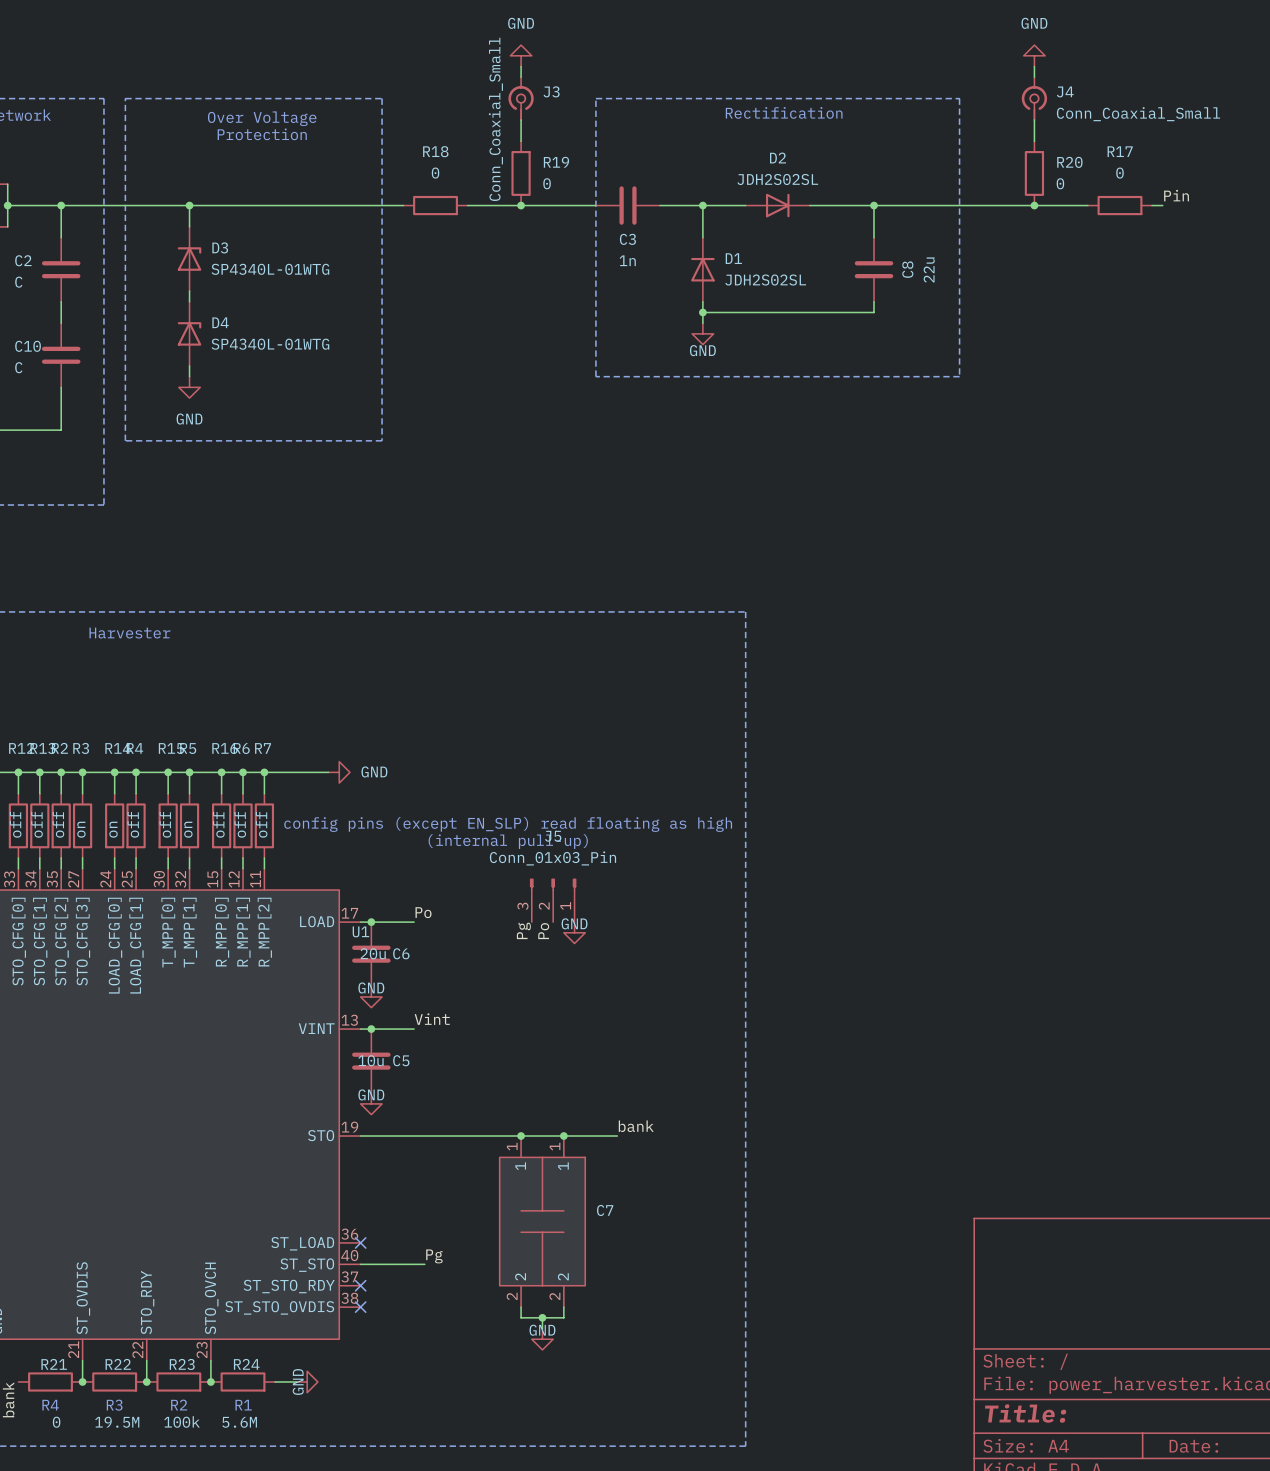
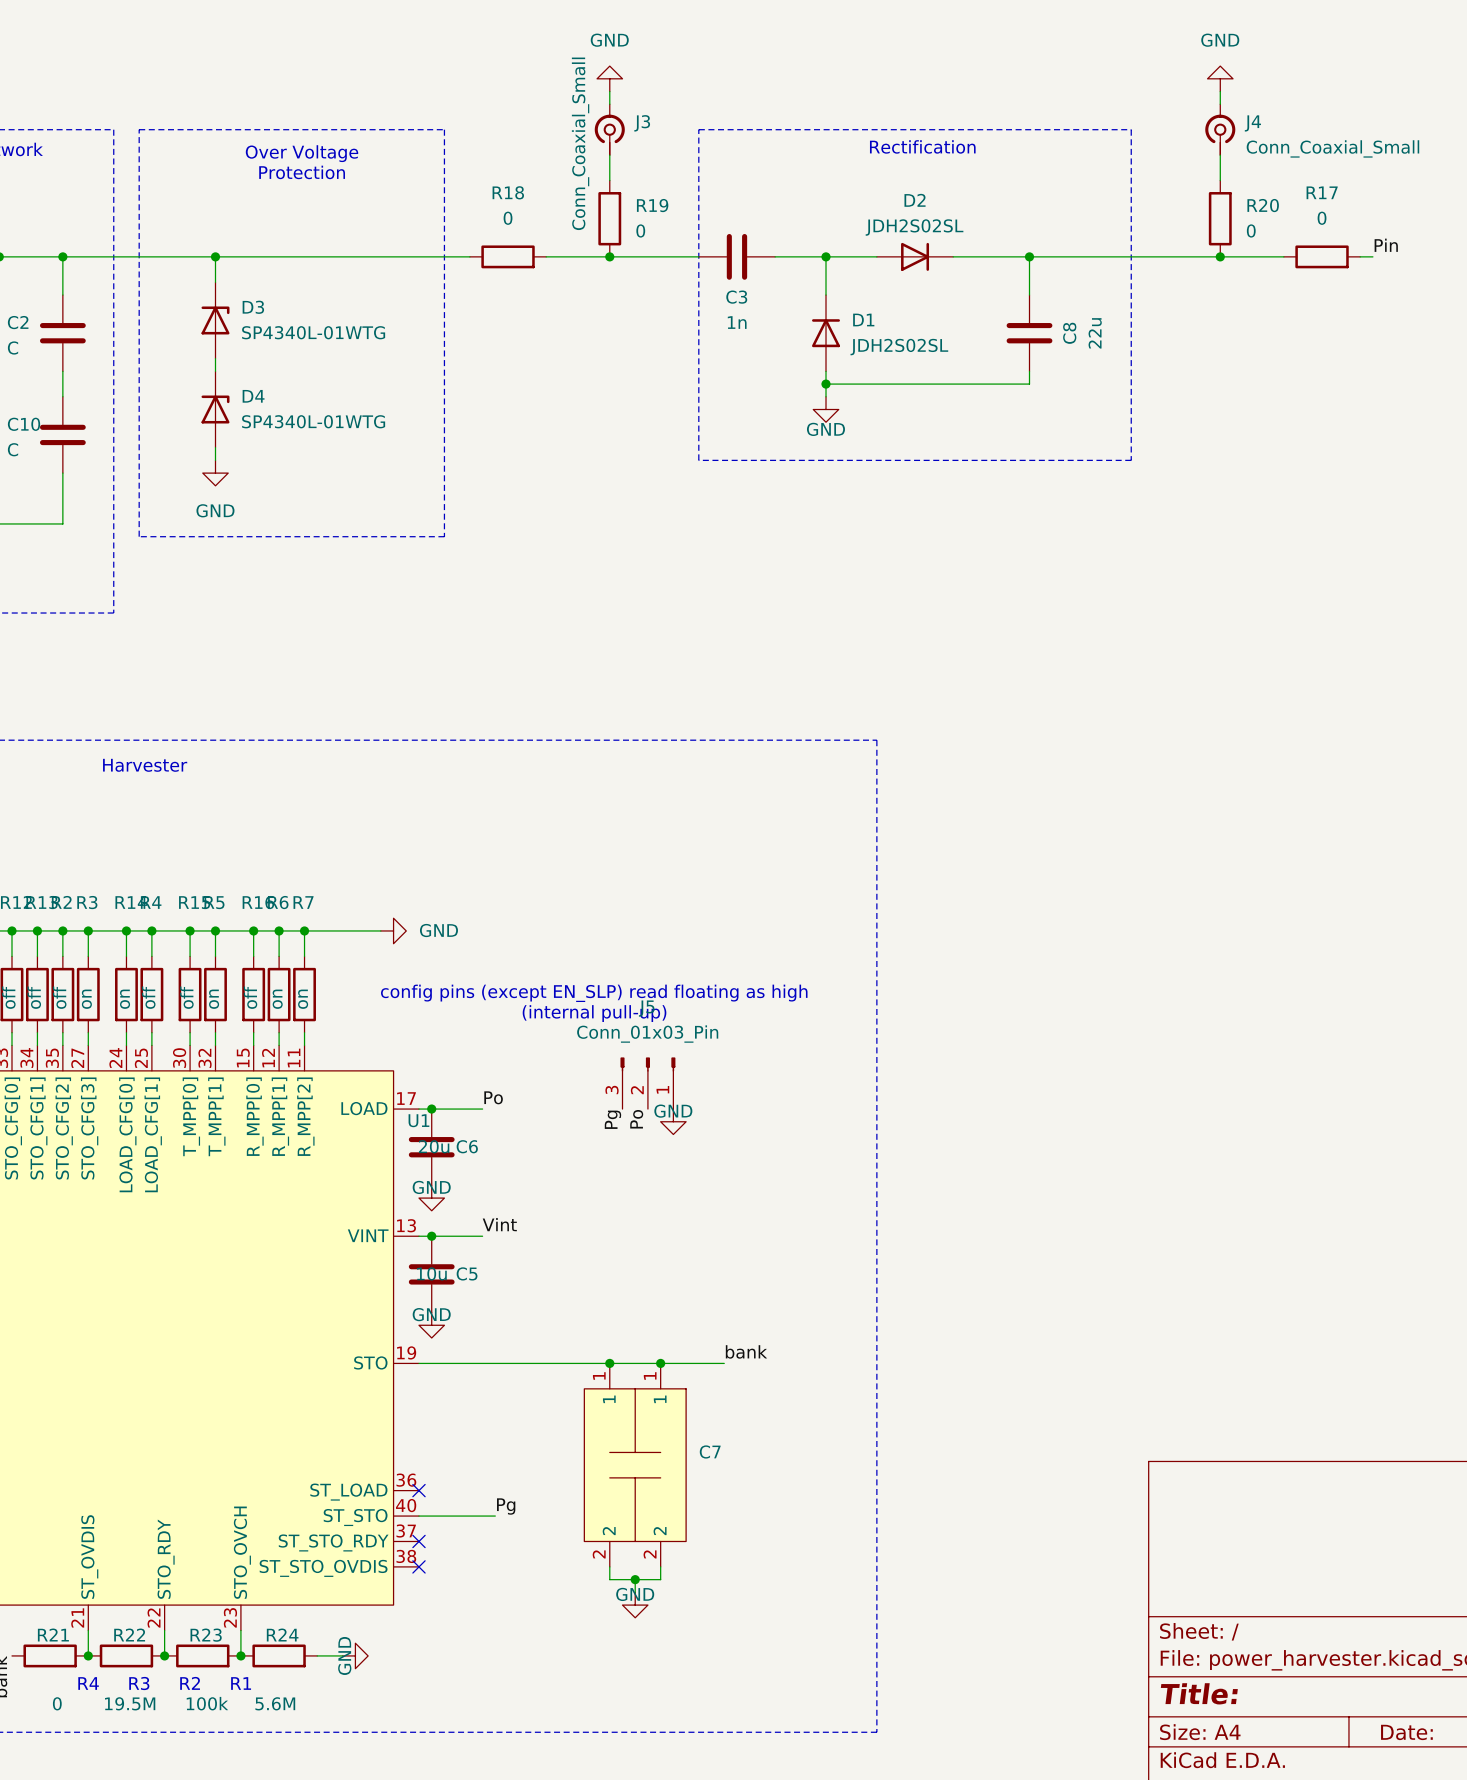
R6 value: off (240, 824) -> on (277, 999)
R7 value: off (261, 824) -> on (303, 999)

